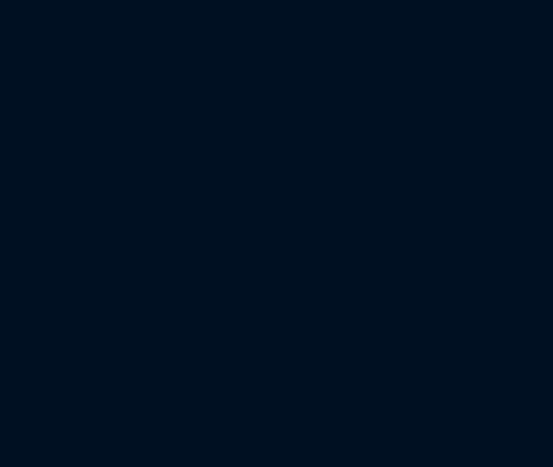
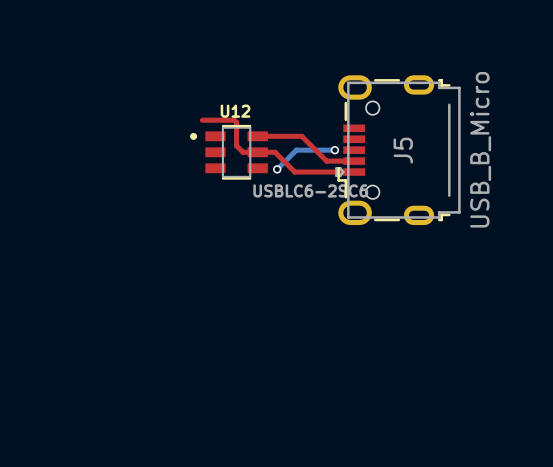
top track: none -> (202, 120) (234, 120) (236, 122) (236, 145) (243, 152) (275, 152) (294, 172) (354, 172)
top track: none -> (257, 136) (301, 136) (326, 161) (354, 161)
bottom track: none -> (334, 150) (296, 150) (277, 169)
via: none -> (334, 150)
J5: none -> USB_B_Micro (397, 150)
U12: none -> USBLC6-2SC6 (229, 152)
via: none -> (277, 169)

